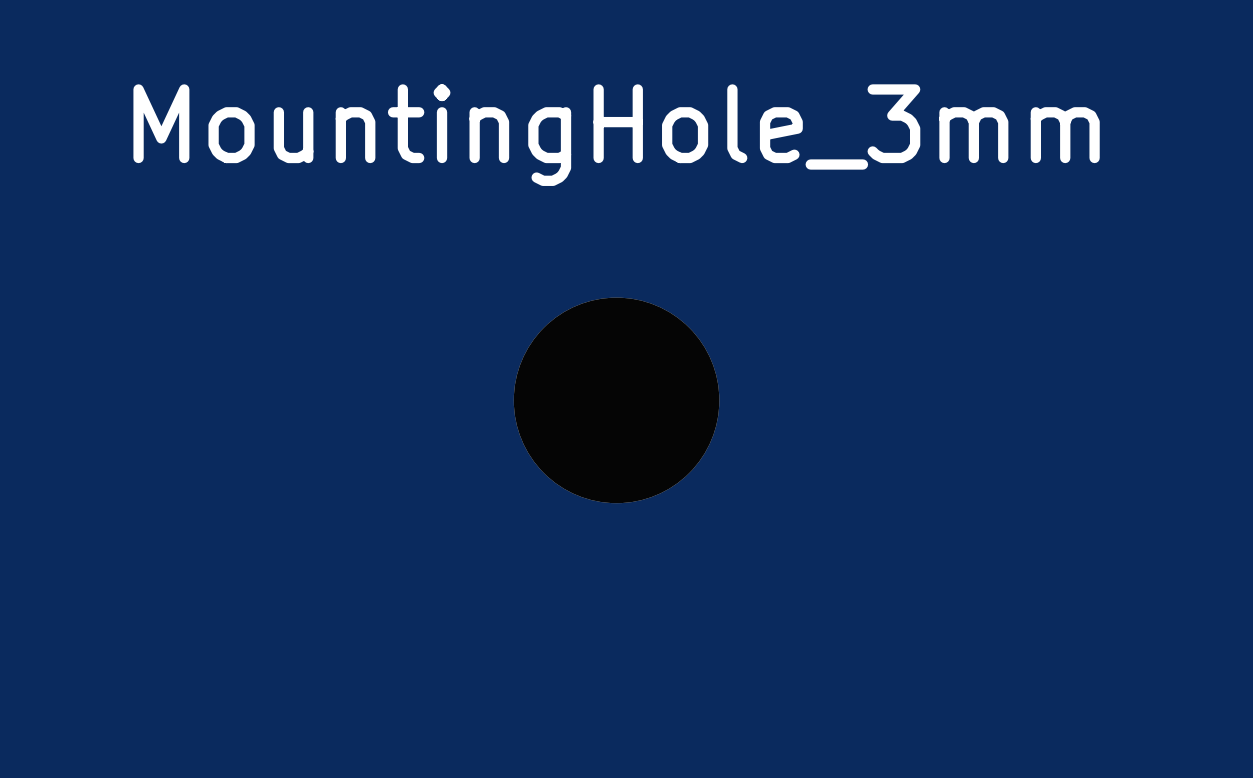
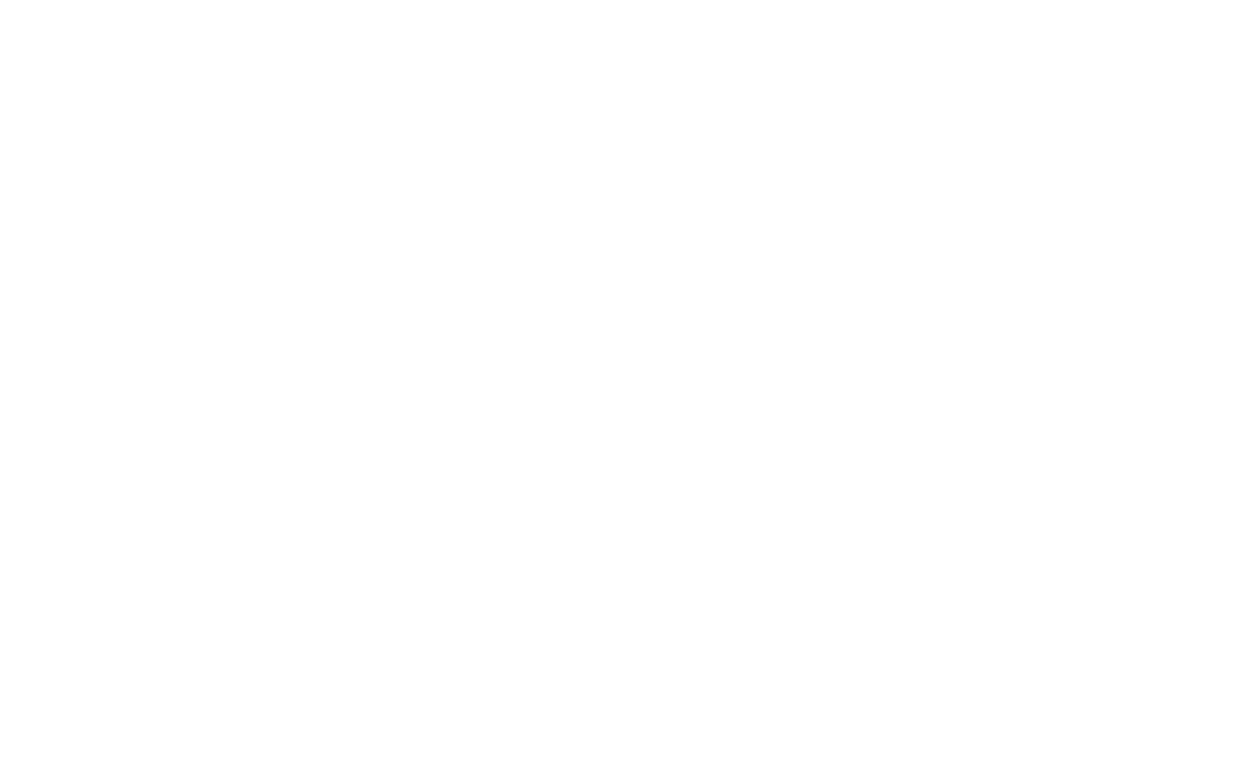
MountingHole_3mm: (616, 400) -> none

